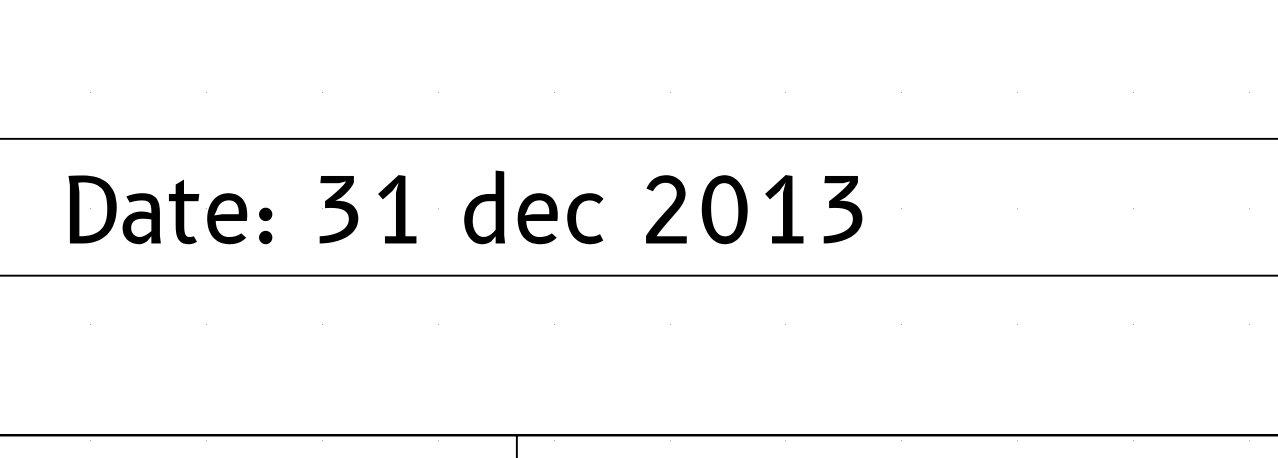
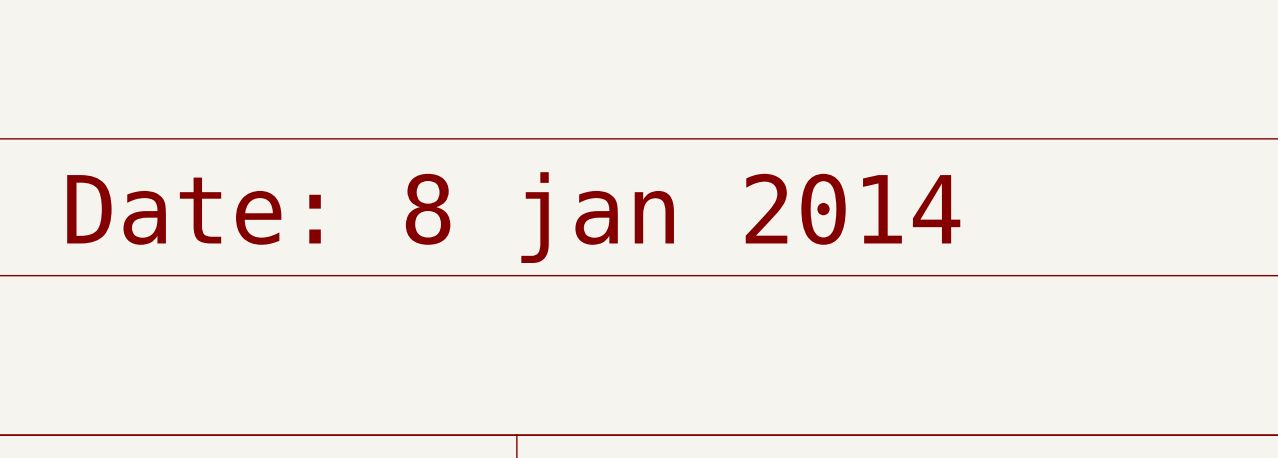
title block: Date: 31 dec 2013 (465, 207) -> Date: 8 jan 2014 (513, 217)

